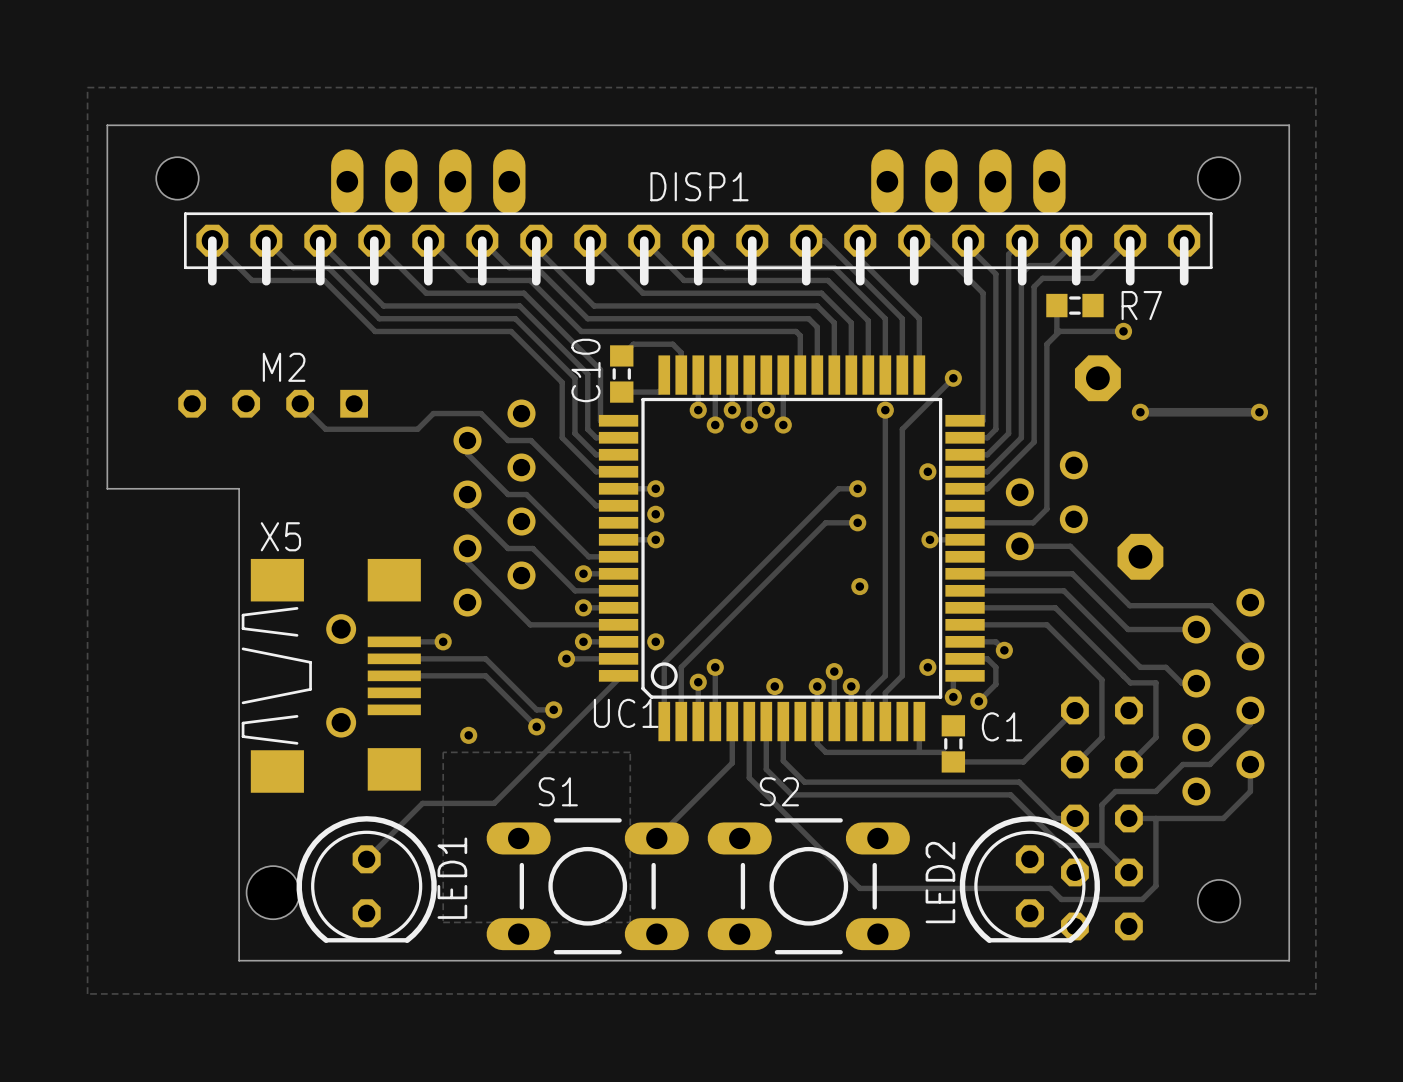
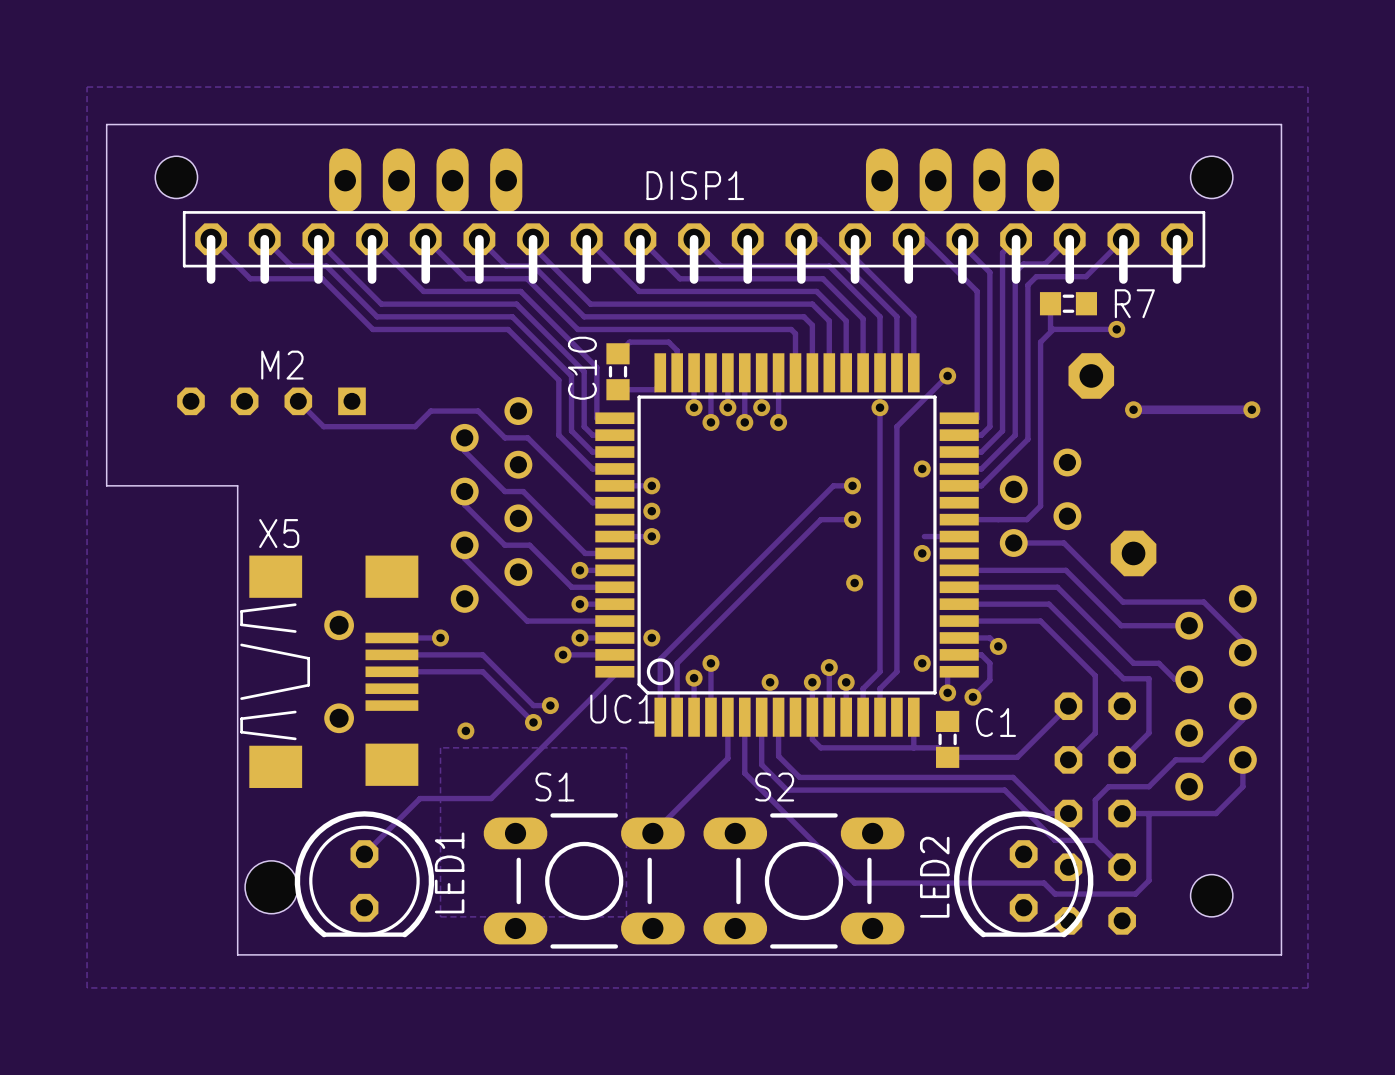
via position: (929, 539) -> (922, 553)

